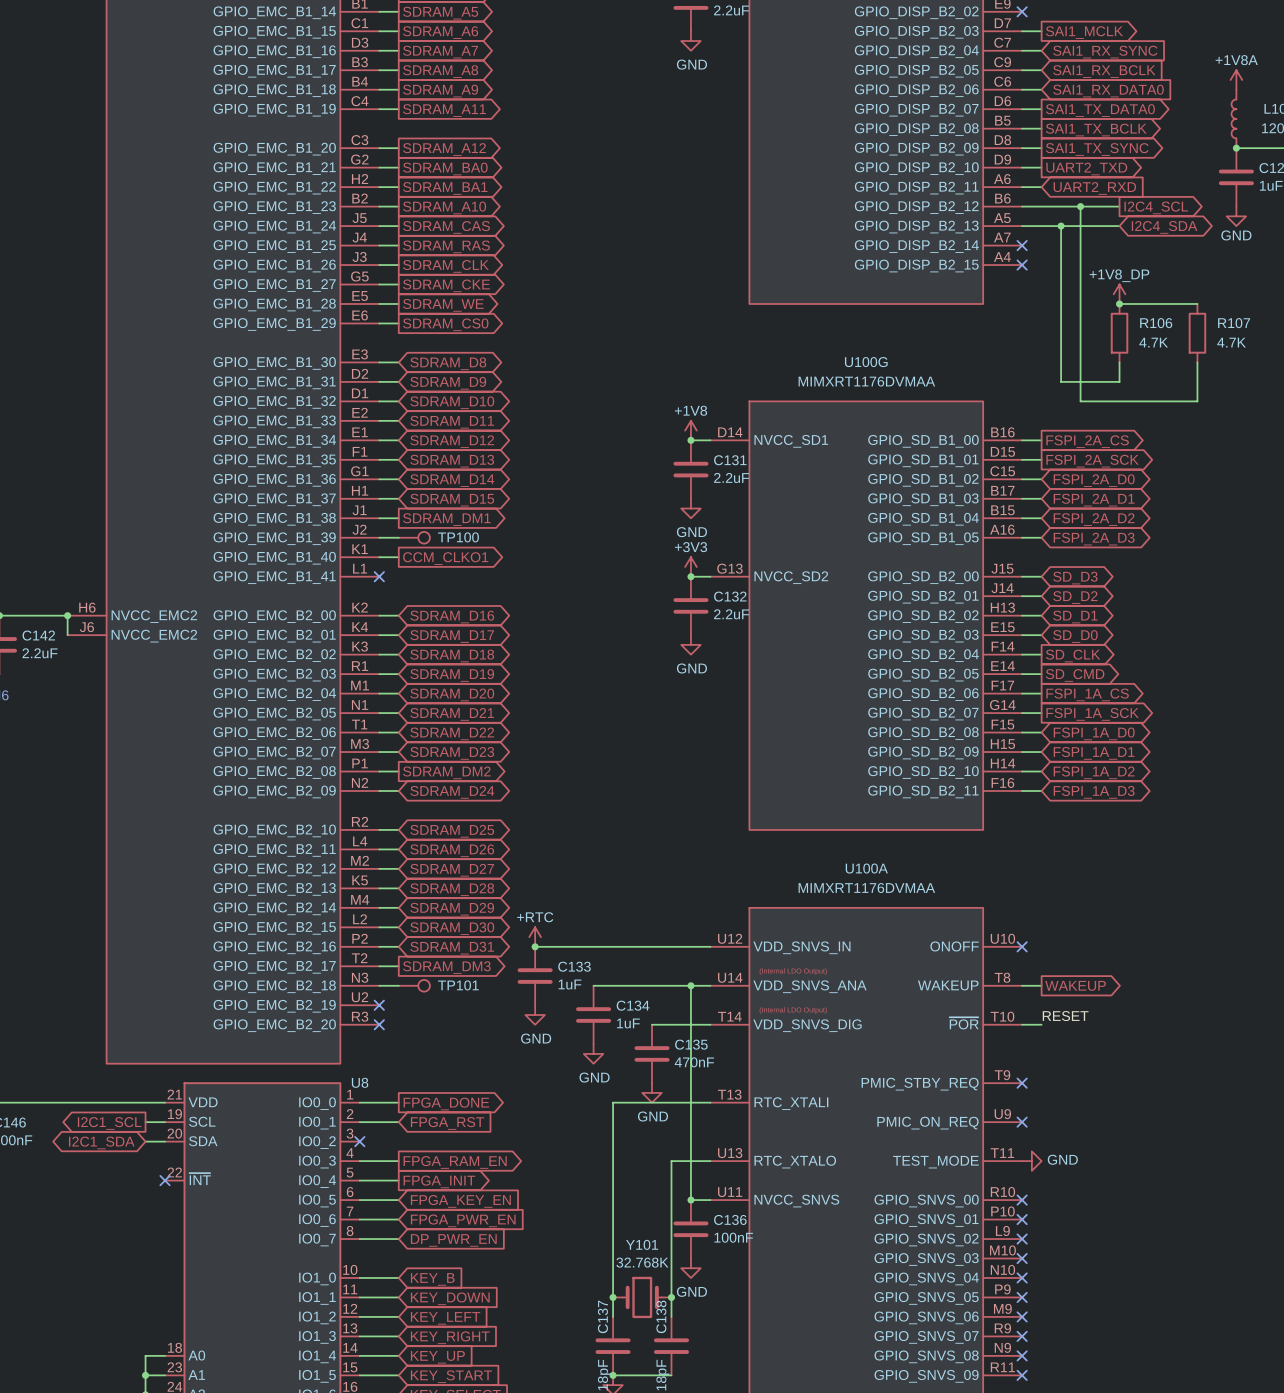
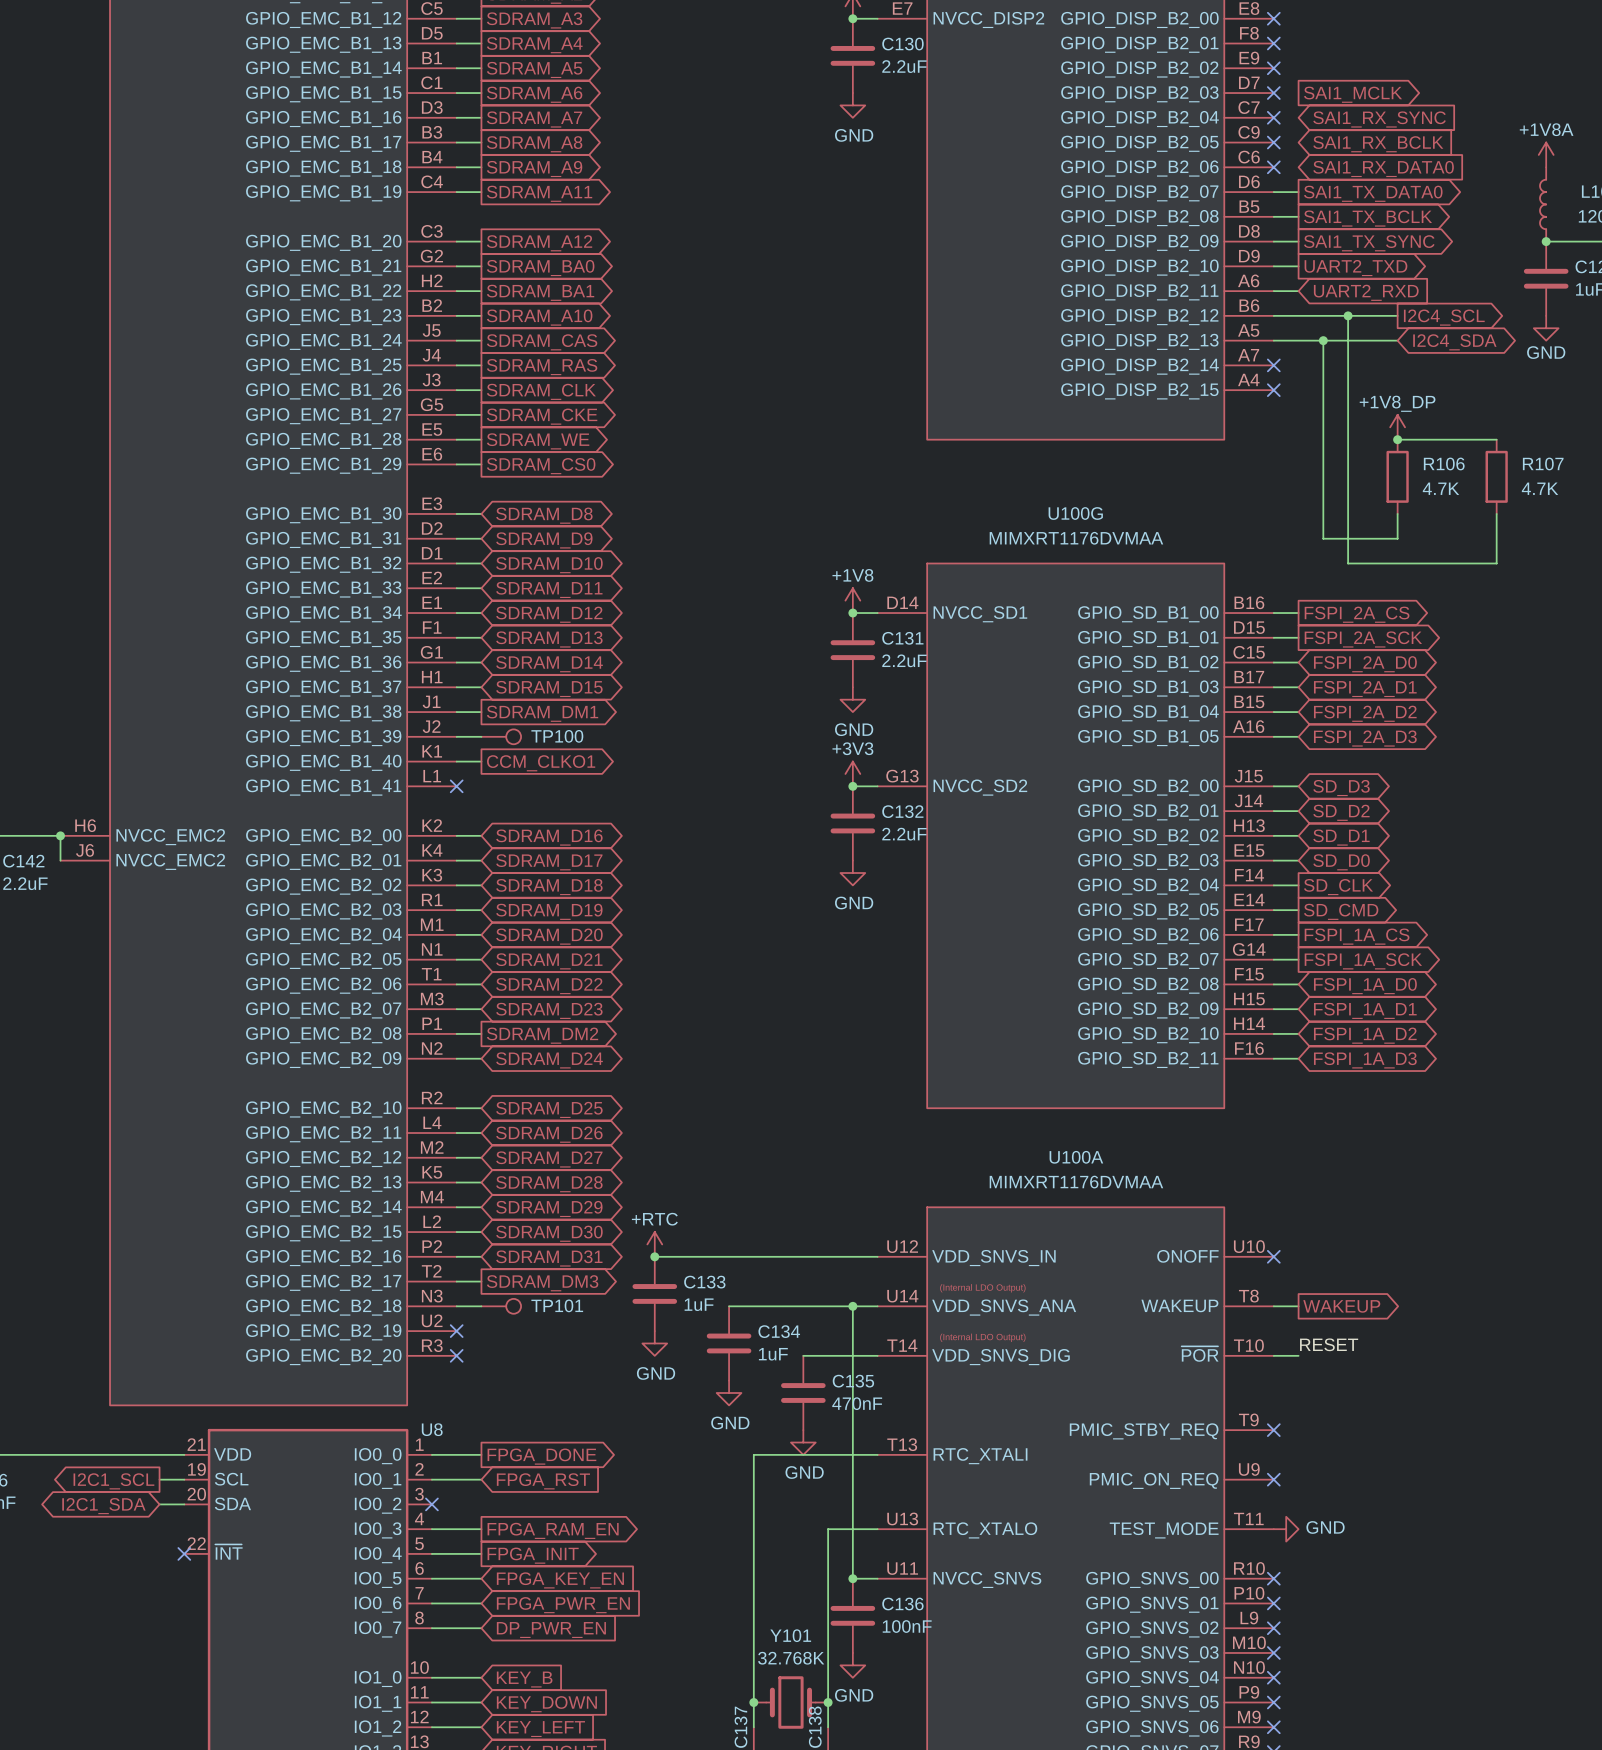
wire: (1022, 31) (1041, 31) -> none
no-connect mark: none -> (1273, 93)
wire: (1022, 50) (1041, 50) -> none
no-connect mark: none -> (1273, 117)
wire: (1022, 70) (1041, 70) -> none
no-connect mark: none -> (1273, 142)
wire: (1022, 89) (1041, 89) -> none
no-connect mark: none -> (1273, 167)

